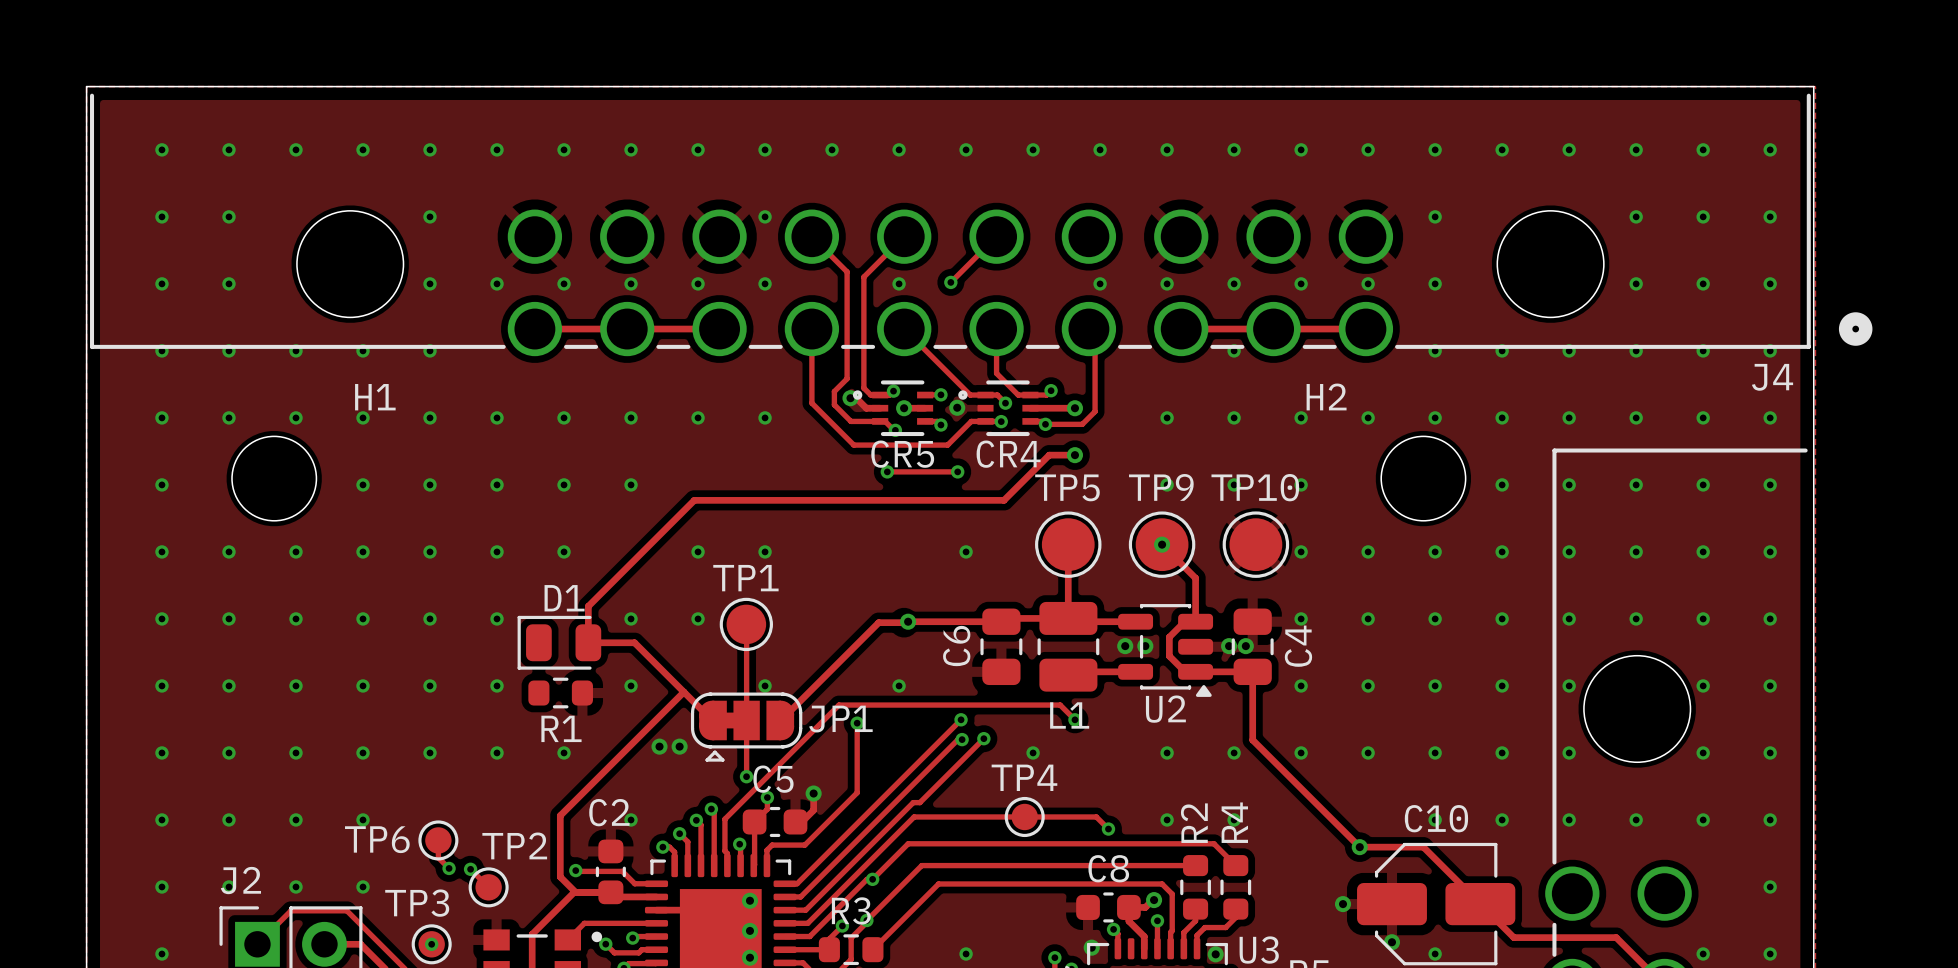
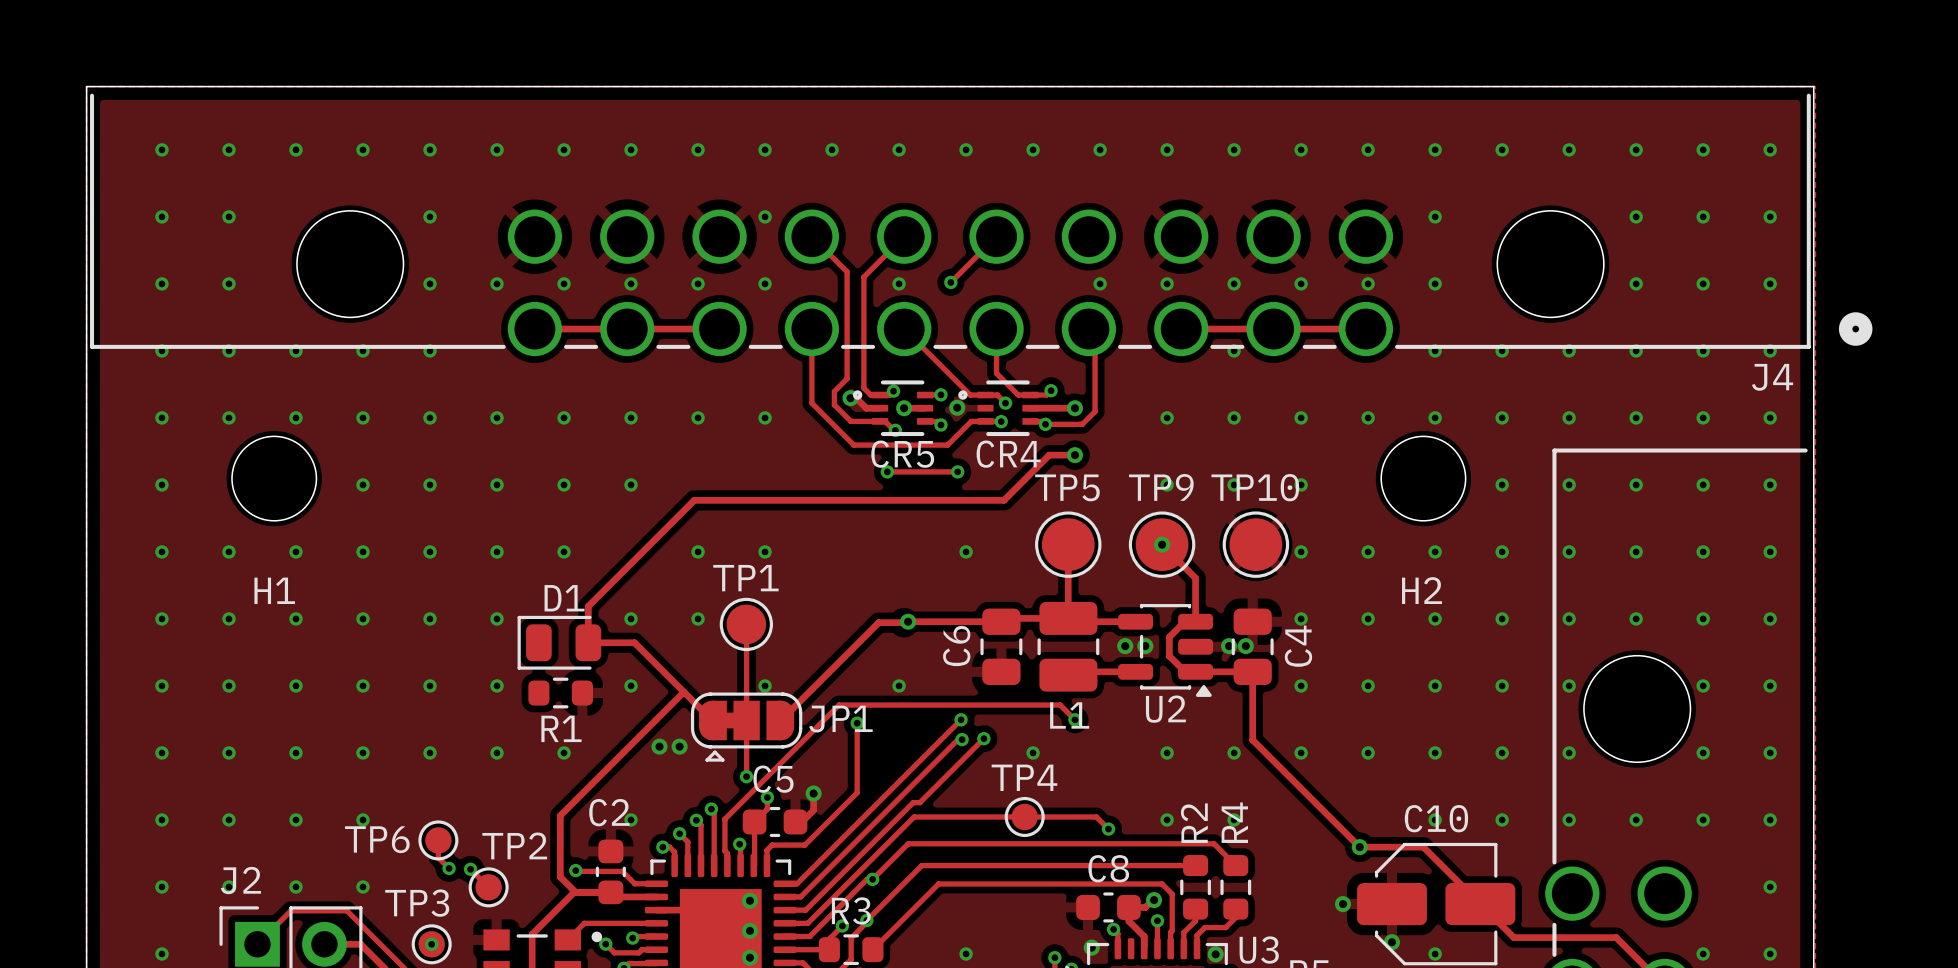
H2 name position: H2 (1326, 396) -> H2 (1422, 590)
H1 name position: H1 (375, 397) -> H1 (274, 590)

